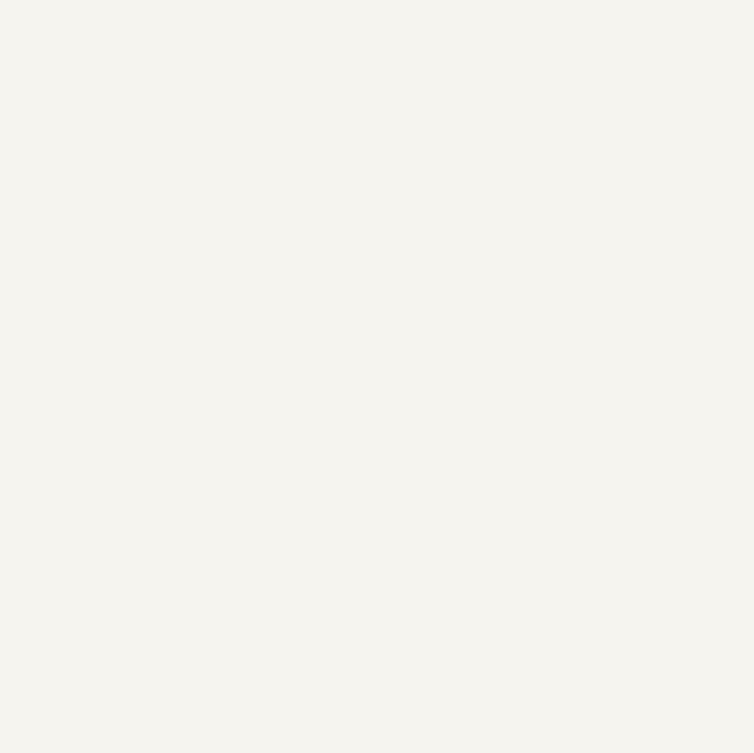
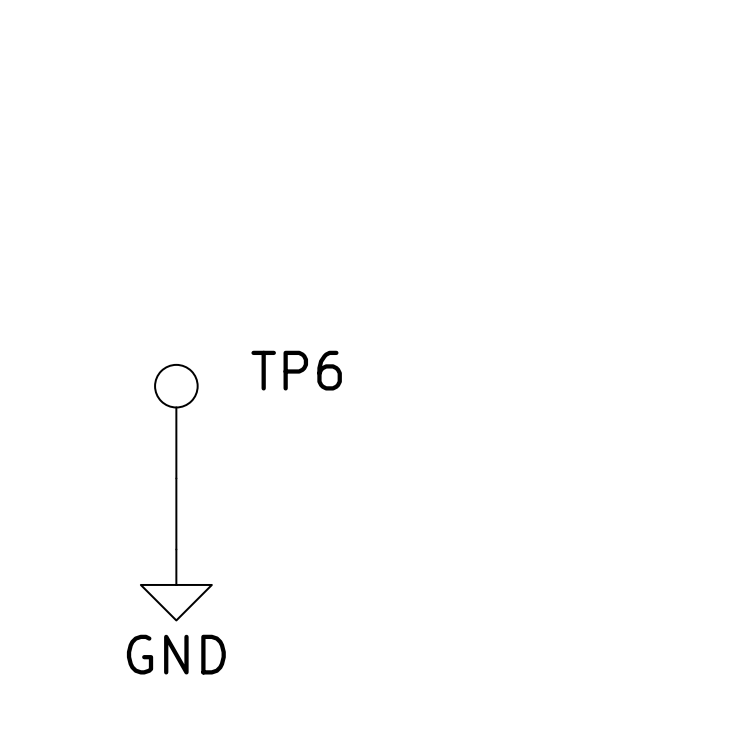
TP6: none -> (176, 421)
wire: none -> (176, 478) (176, 549)
power symbol: none -> GND (176, 584)

